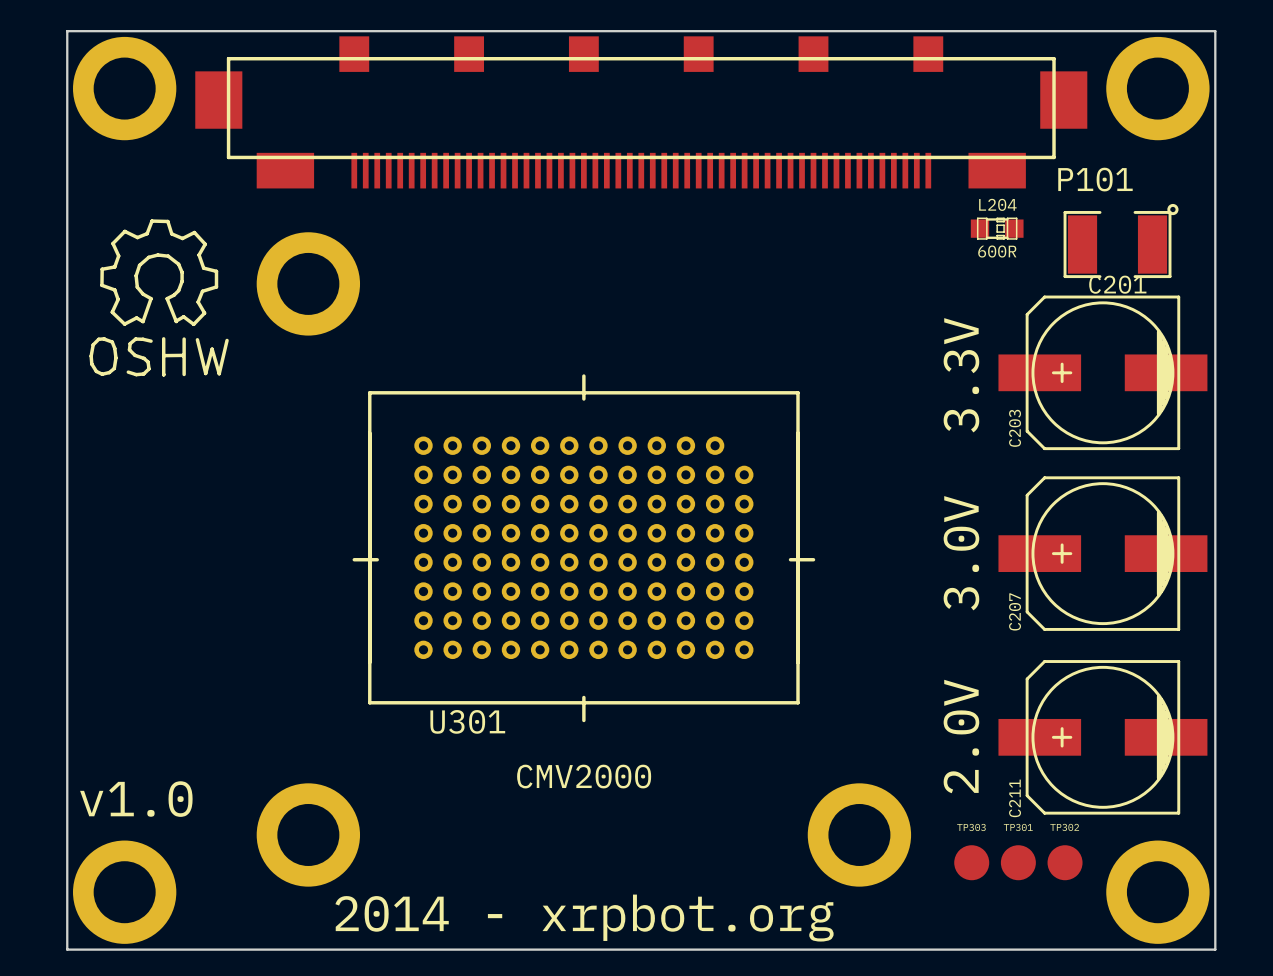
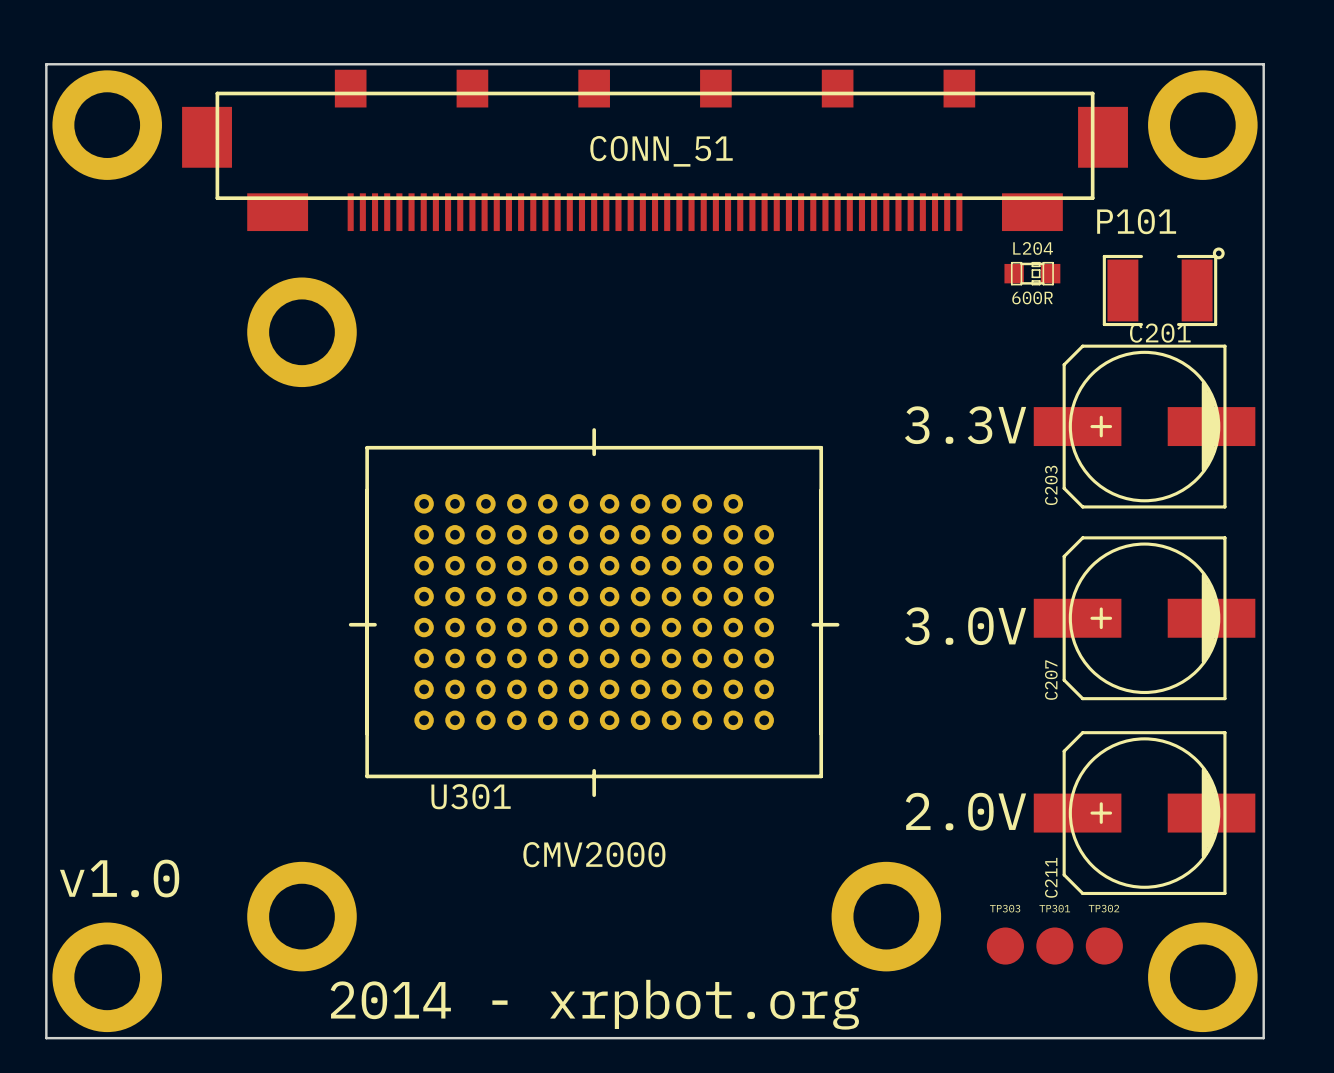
P101 value: none -> CONN_51 (661, 151)
drawing: [89, 219, 229, 377] -> none
text rotation: 0° (961, 375) -> 90° clockwise (965, 425)
text rotation: 0° (961, 553) -> 90° clockwise (965, 626)
text rotation: 0° (961, 736) -> 90° clockwise (965, 811)

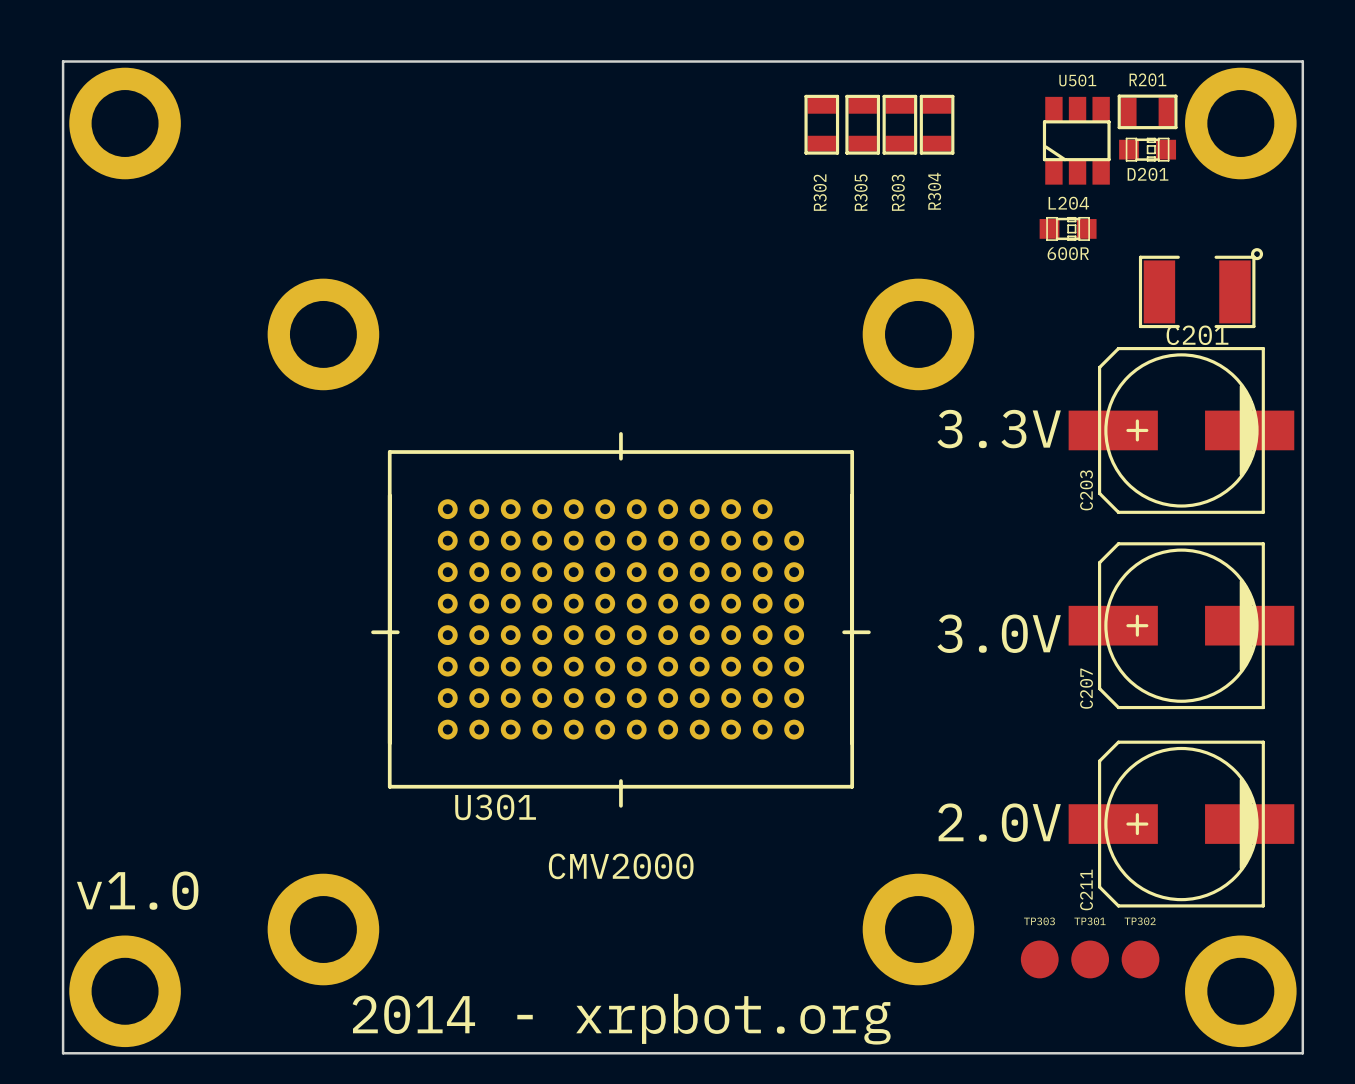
R201: none -> (1147, 111)
R302: none -> (821, 124)
R305: none -> (862, 124)
R303: none -> (899, 124)
R304: none -> (937, 124)
U501: none -> (1076, 140)
P101: CONN_51 (655, 150) -> none
D201: none -> (1147, 149)
L204 position: (1032, 273) -> (1068, 228)
part: none -> (918, 334)

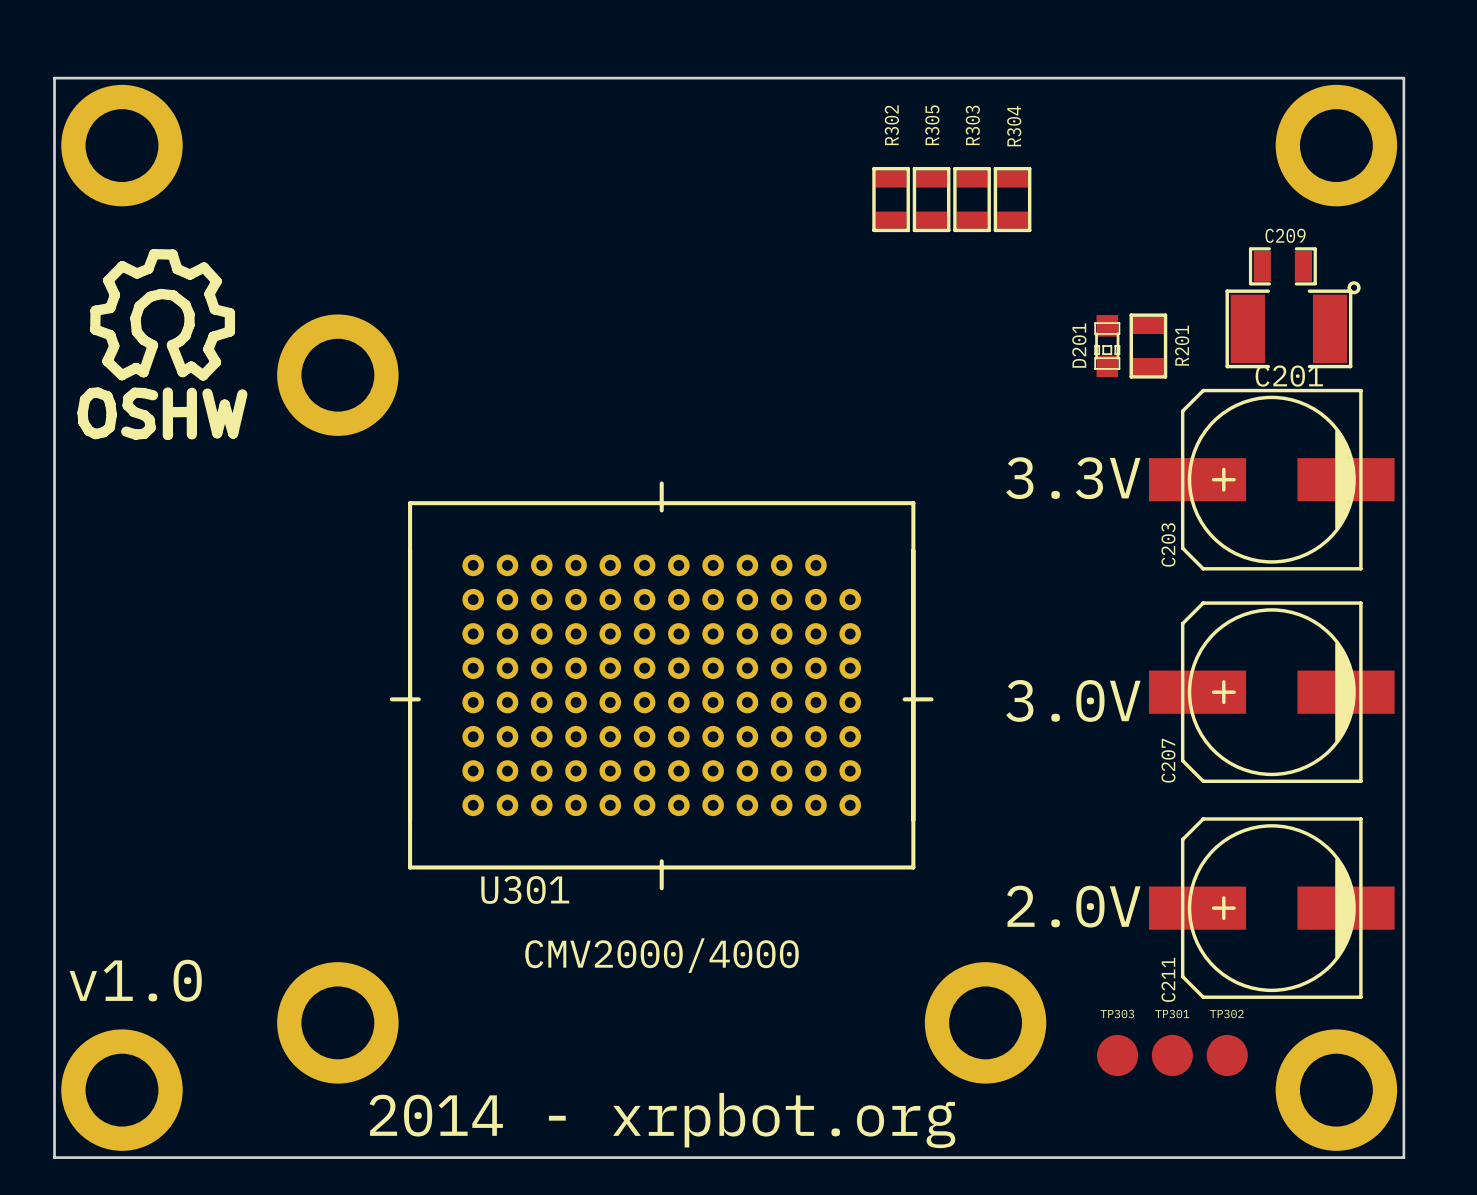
R201 rotation: 0° (1147, 111) -> 90° clockwise (1148, 346)
R201 position: (1147, 111) -> (1148, 346)
R302 position: (821, 124) -> (891, 199)
R305 position: (862, 124) -> (931, 199)
R303 position: (899, 124) -> (972, 199)
R304 position: (937, 124) -> (1012, 199)
U501: (1076, 140) -> none
D201 rotation: 0° (1147, 149) -> 90° clockwise (1107, 346)
D201 position: (1147, 149) -> (1107, 346)
R304 name position: R304 (934, 191) -> R304 (1014, 126)
R302 name position: R302 (820, 192) -> R302 (891, 125)
R305 name position: R305 (861, 192) -> R305 (932, 125)
R303 name position: R303 (898, 192) -> R303 (972, 125)
drawing: none -> [77, 248, 248, 441]
L204: 600R (1068, 228) -> none
C209: none -> (1282, 266)
part: (918, 334) -> none
U301 value: CMV2000 (621, 866) -> CMV2000/4000 (661, 955)

